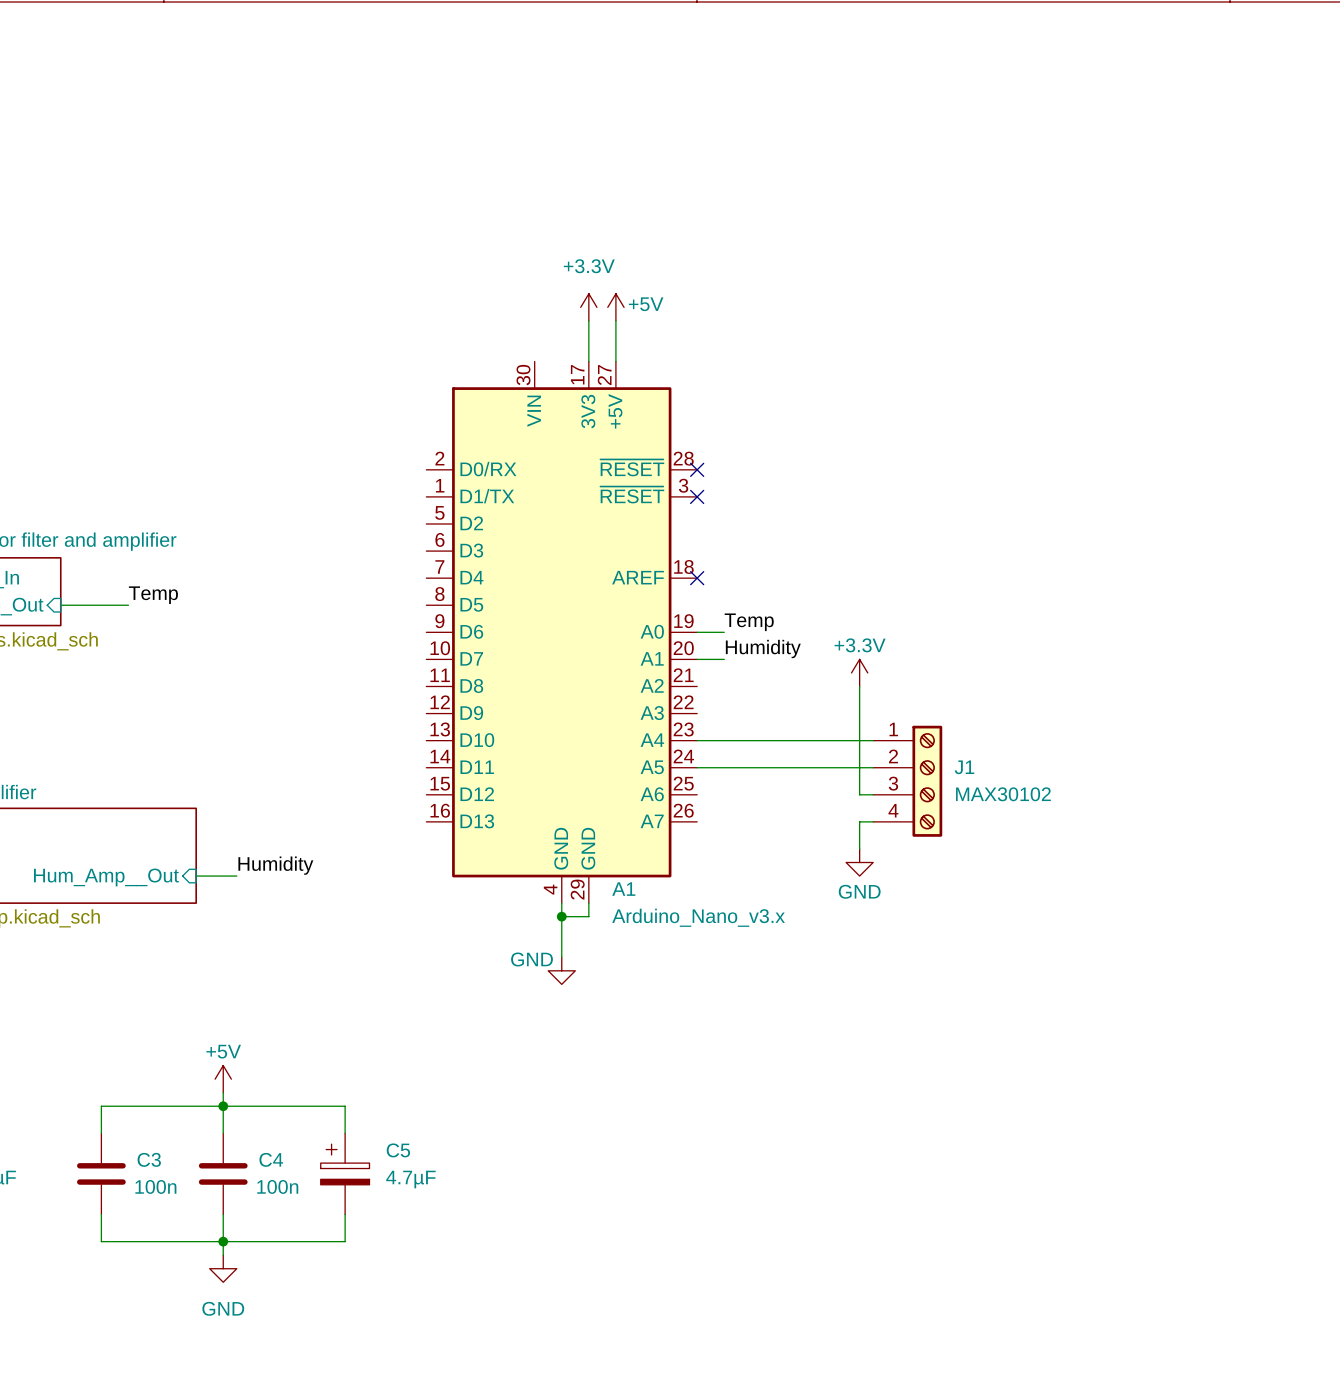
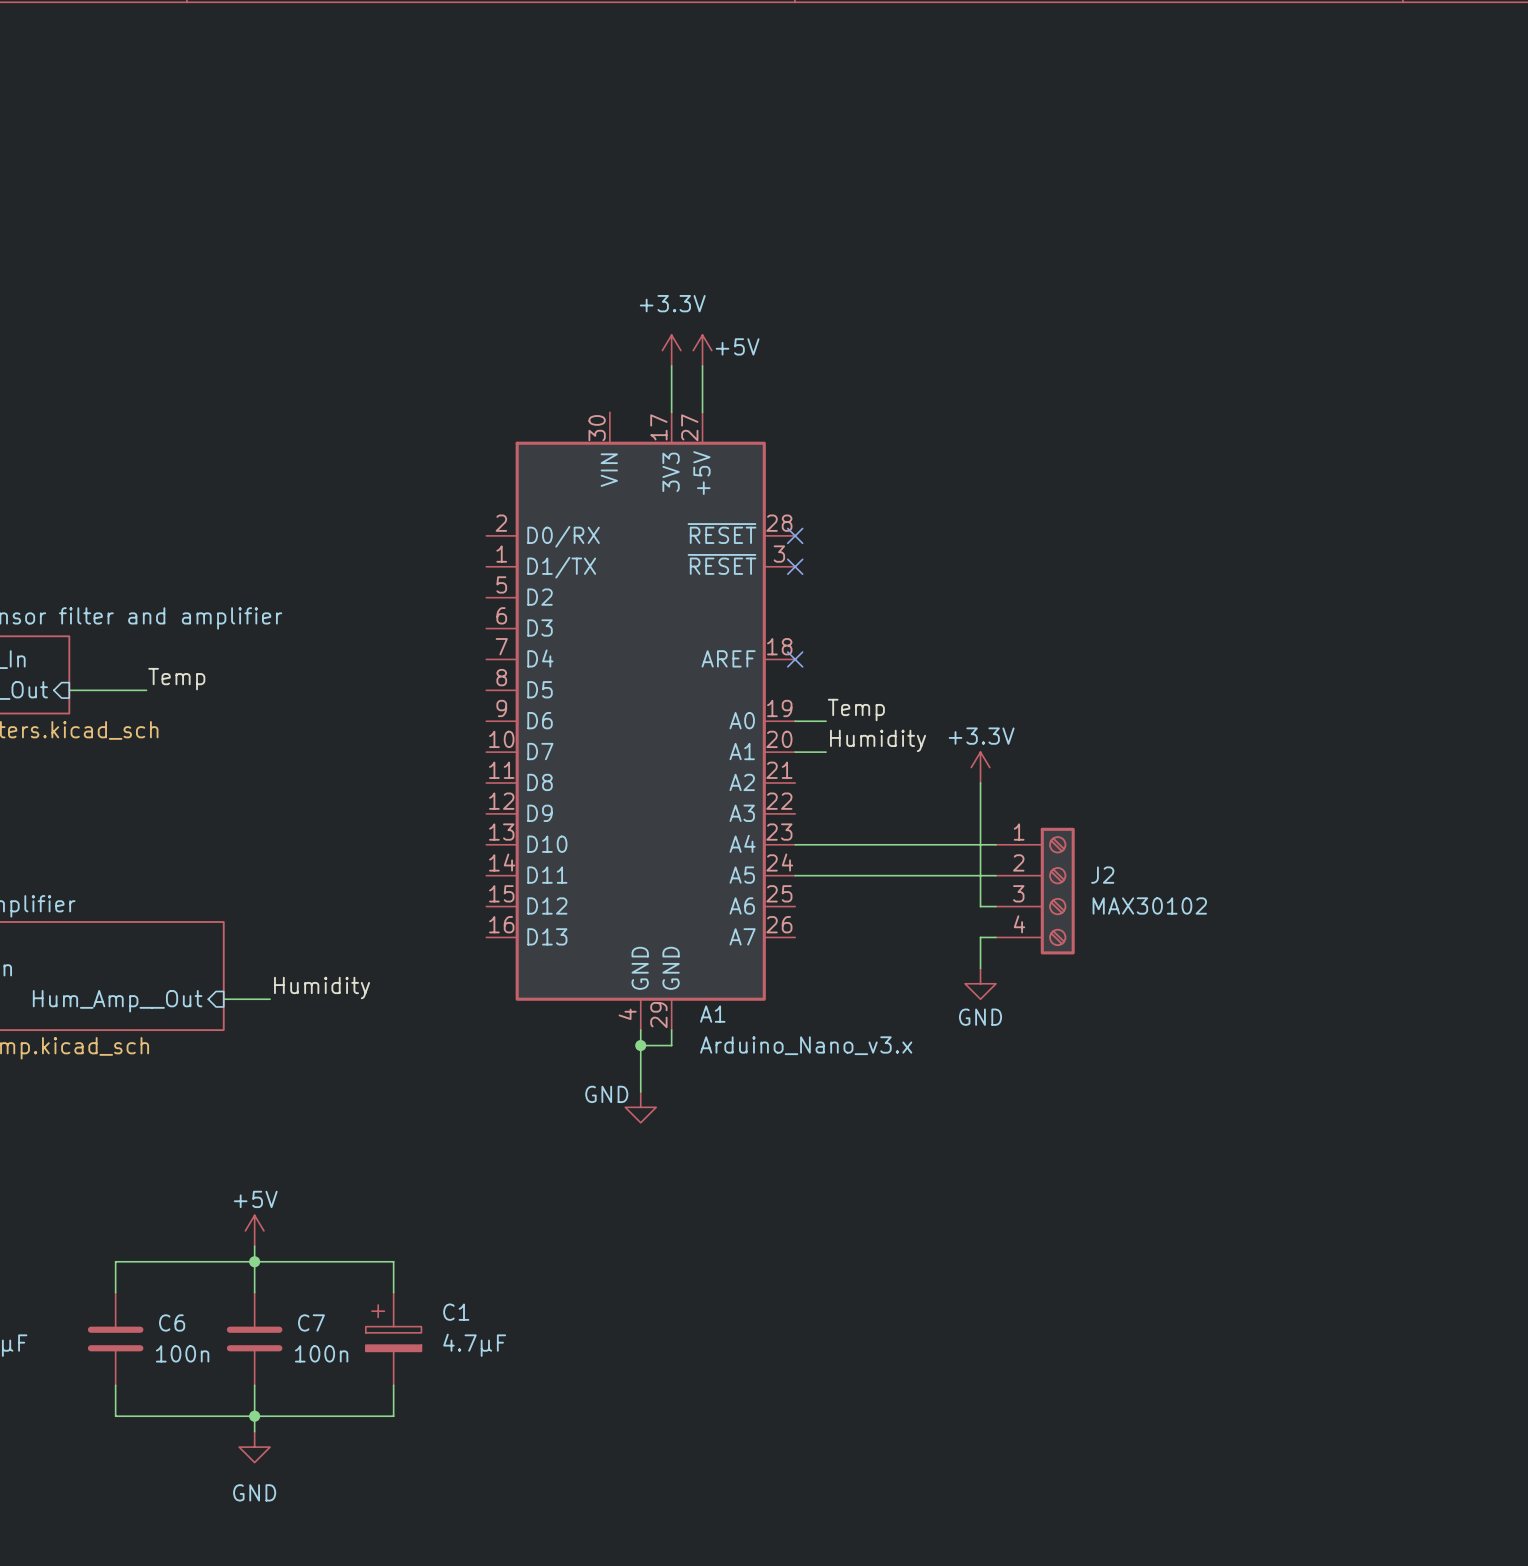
J1 name: J1 (964, 767) -> J2 (1102, 875)
C5 name: C5 (398, 1150) -> C1 (456, 1312)
C3 name: C3 (149, 1159) -> C6 (172, 1322)
C4 name: C4 (271, 1159) -> C7 (311, 1322)

